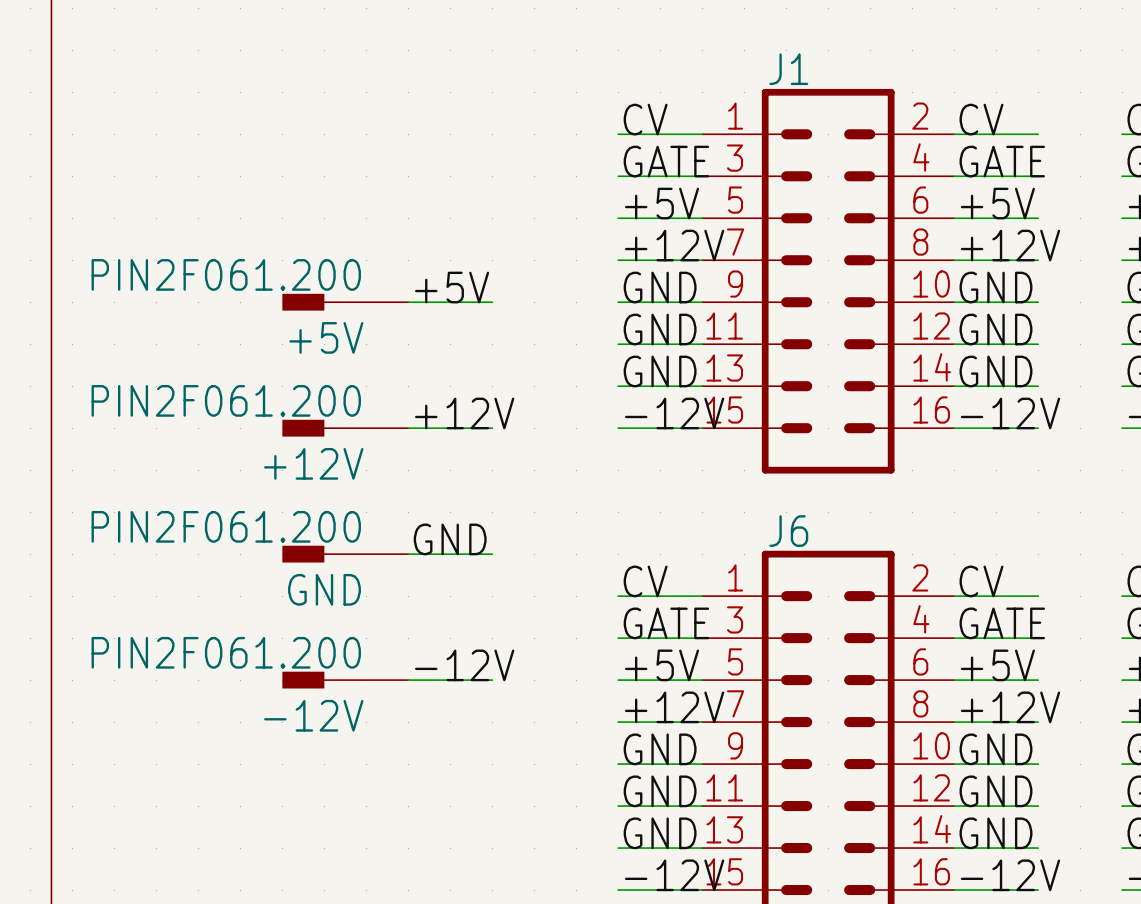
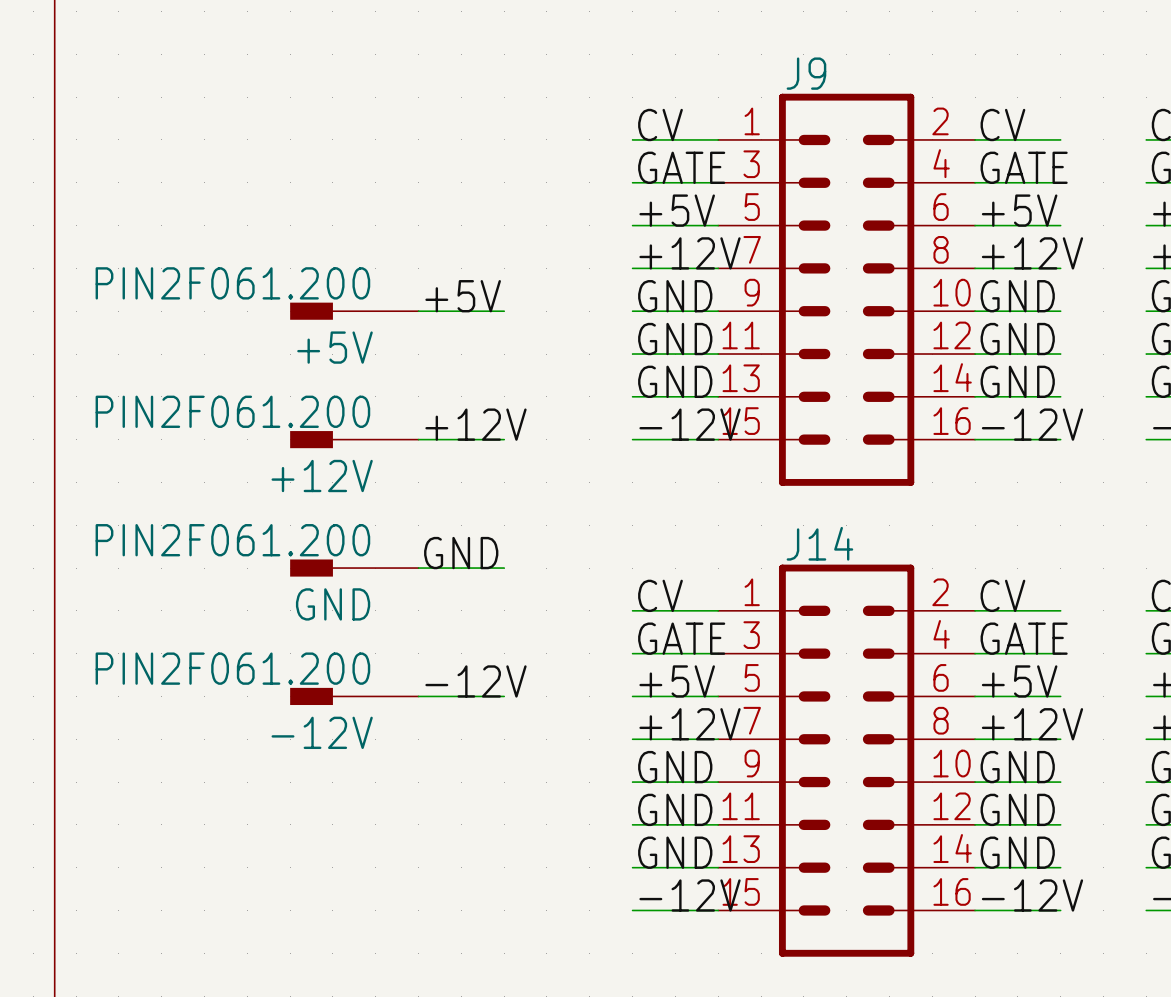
J1 name: J1 (788, 69) -> J9 (806, 73)
J6 name: J6 (788, 531) -> J14 (819, 543)

